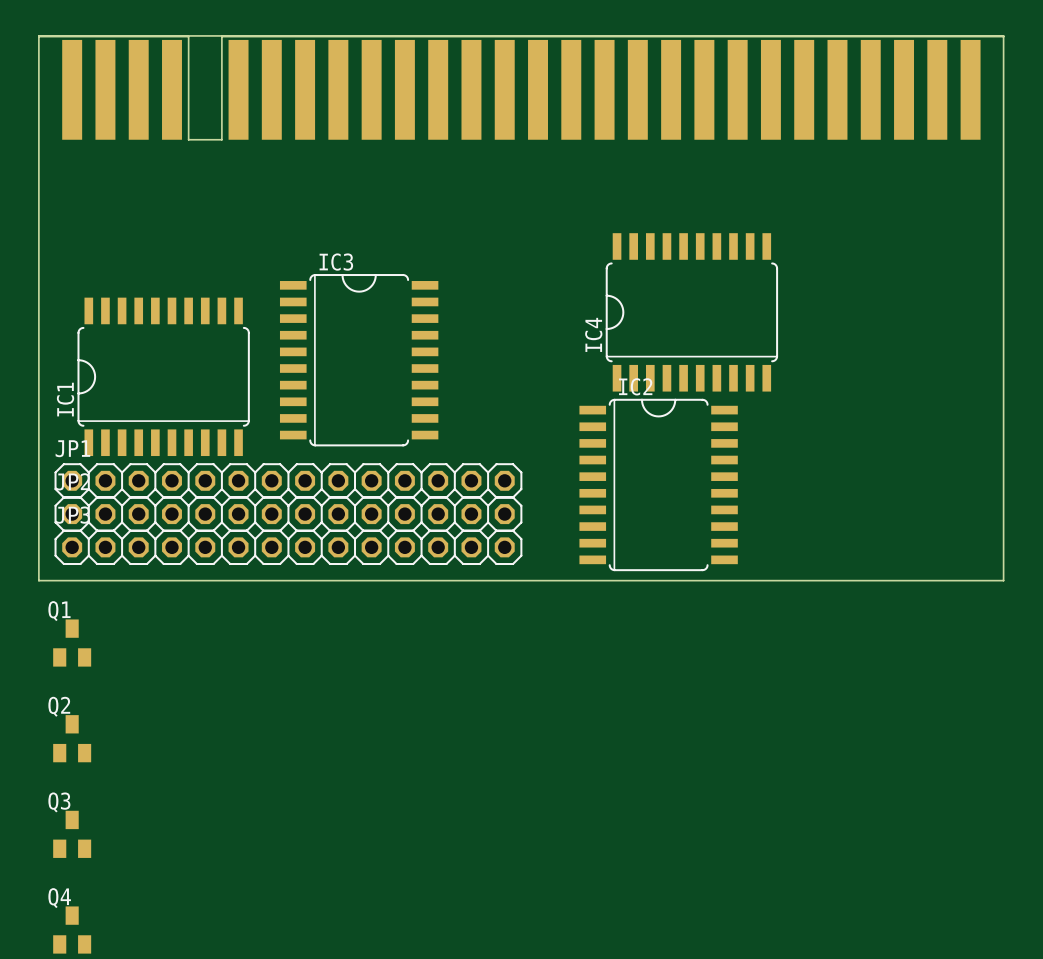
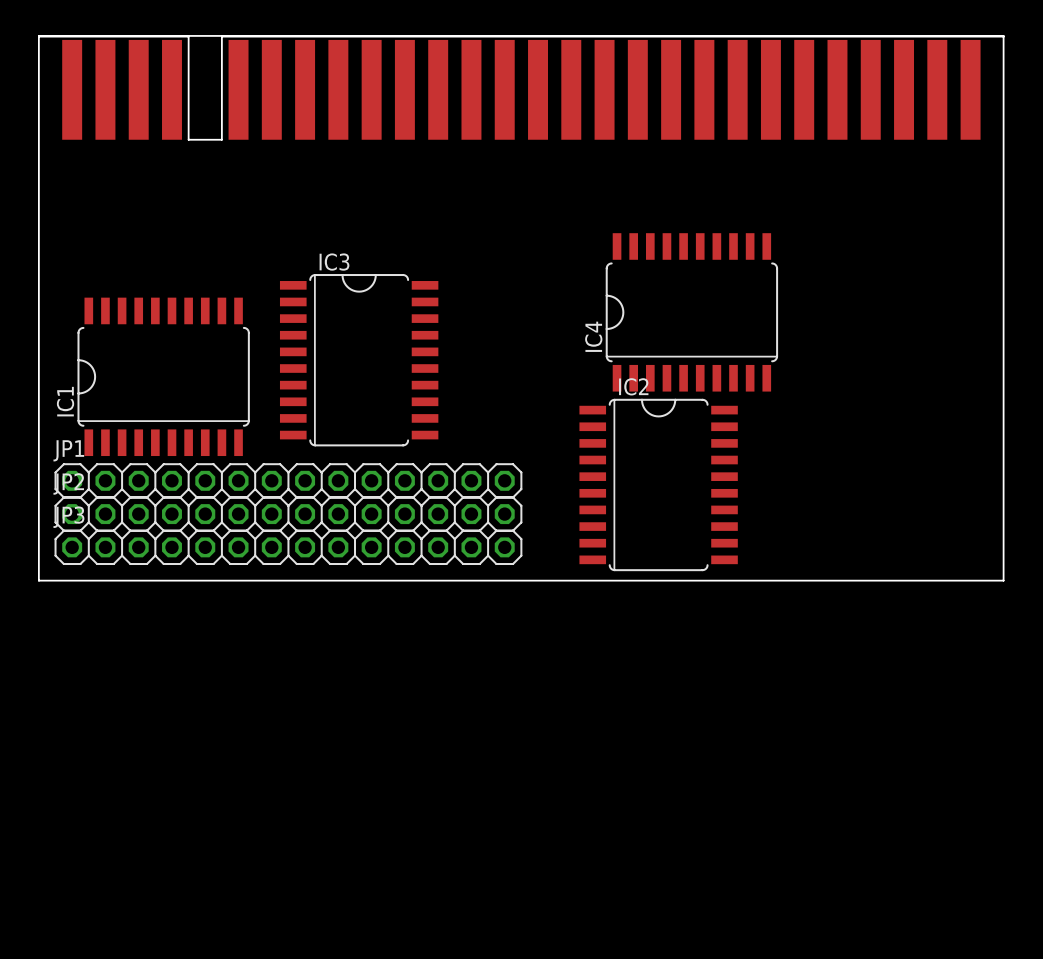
Q1: (72, 643) -> none
Q2: (72, 738) -> none
Q3: (72, 834) -> none
Q4: (72, 930) -> none

